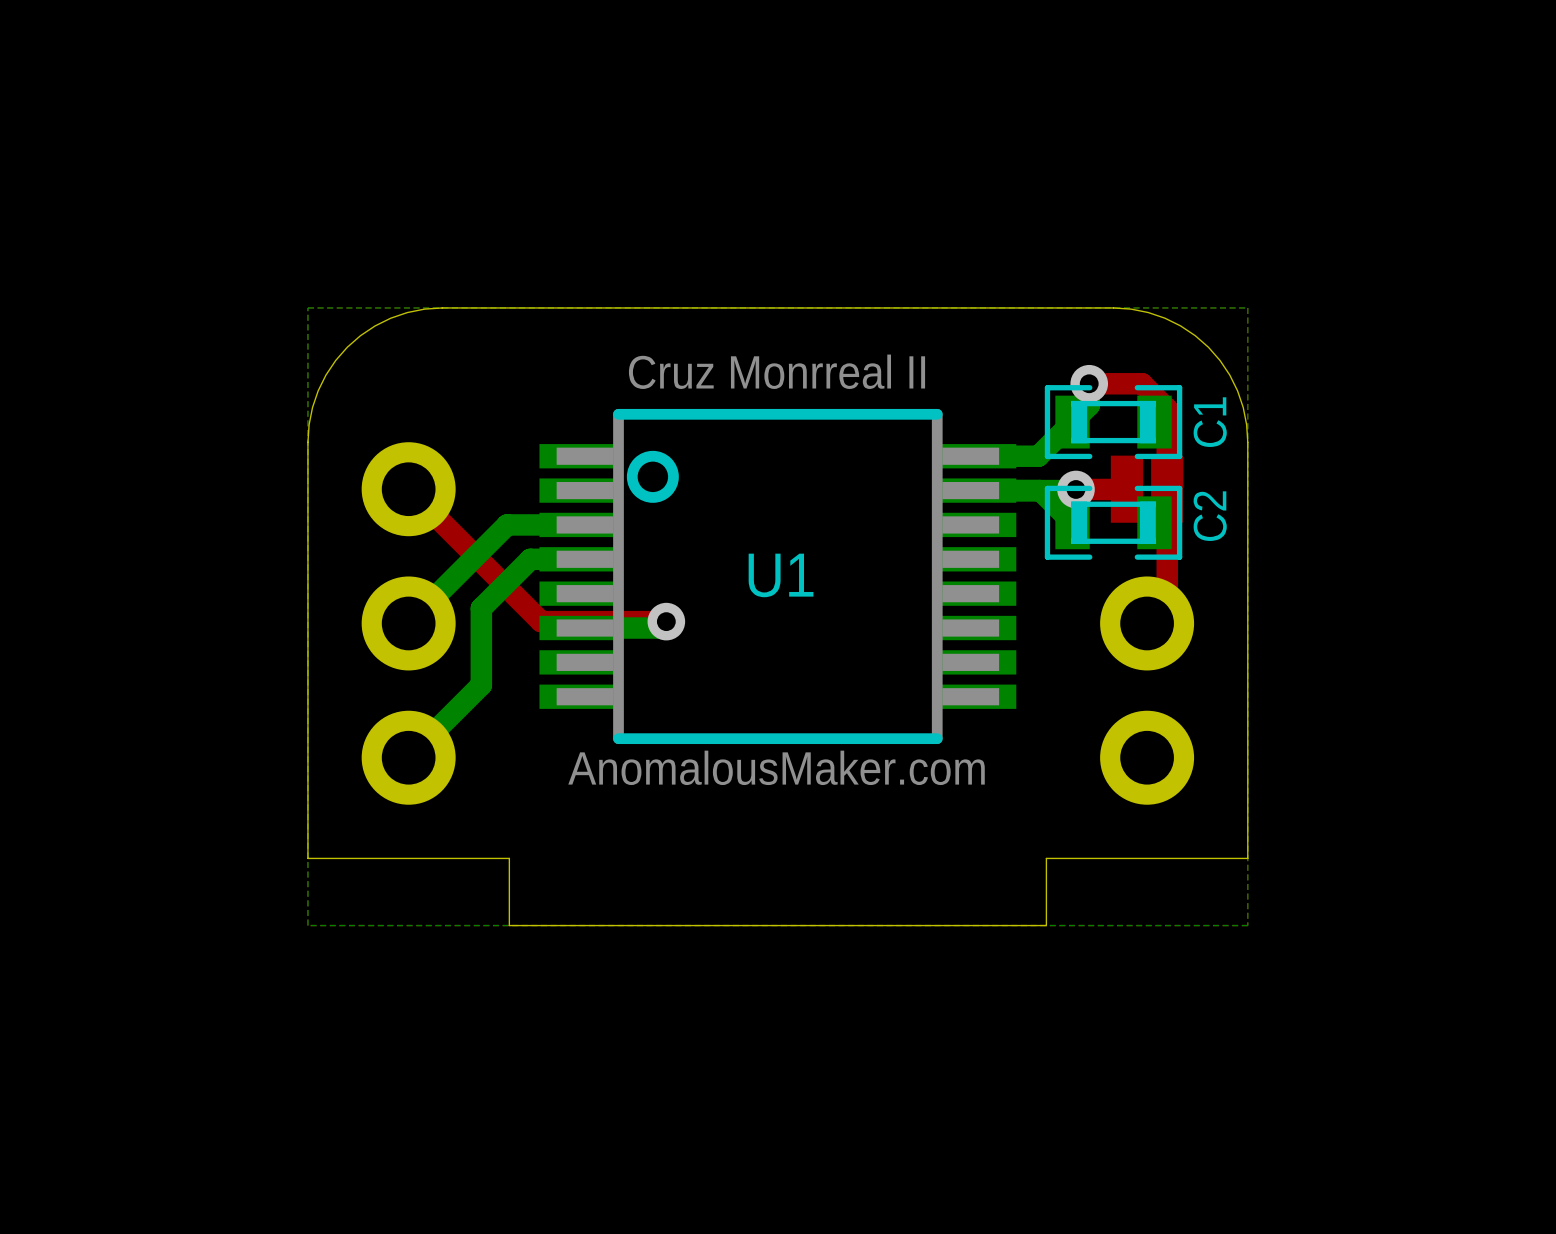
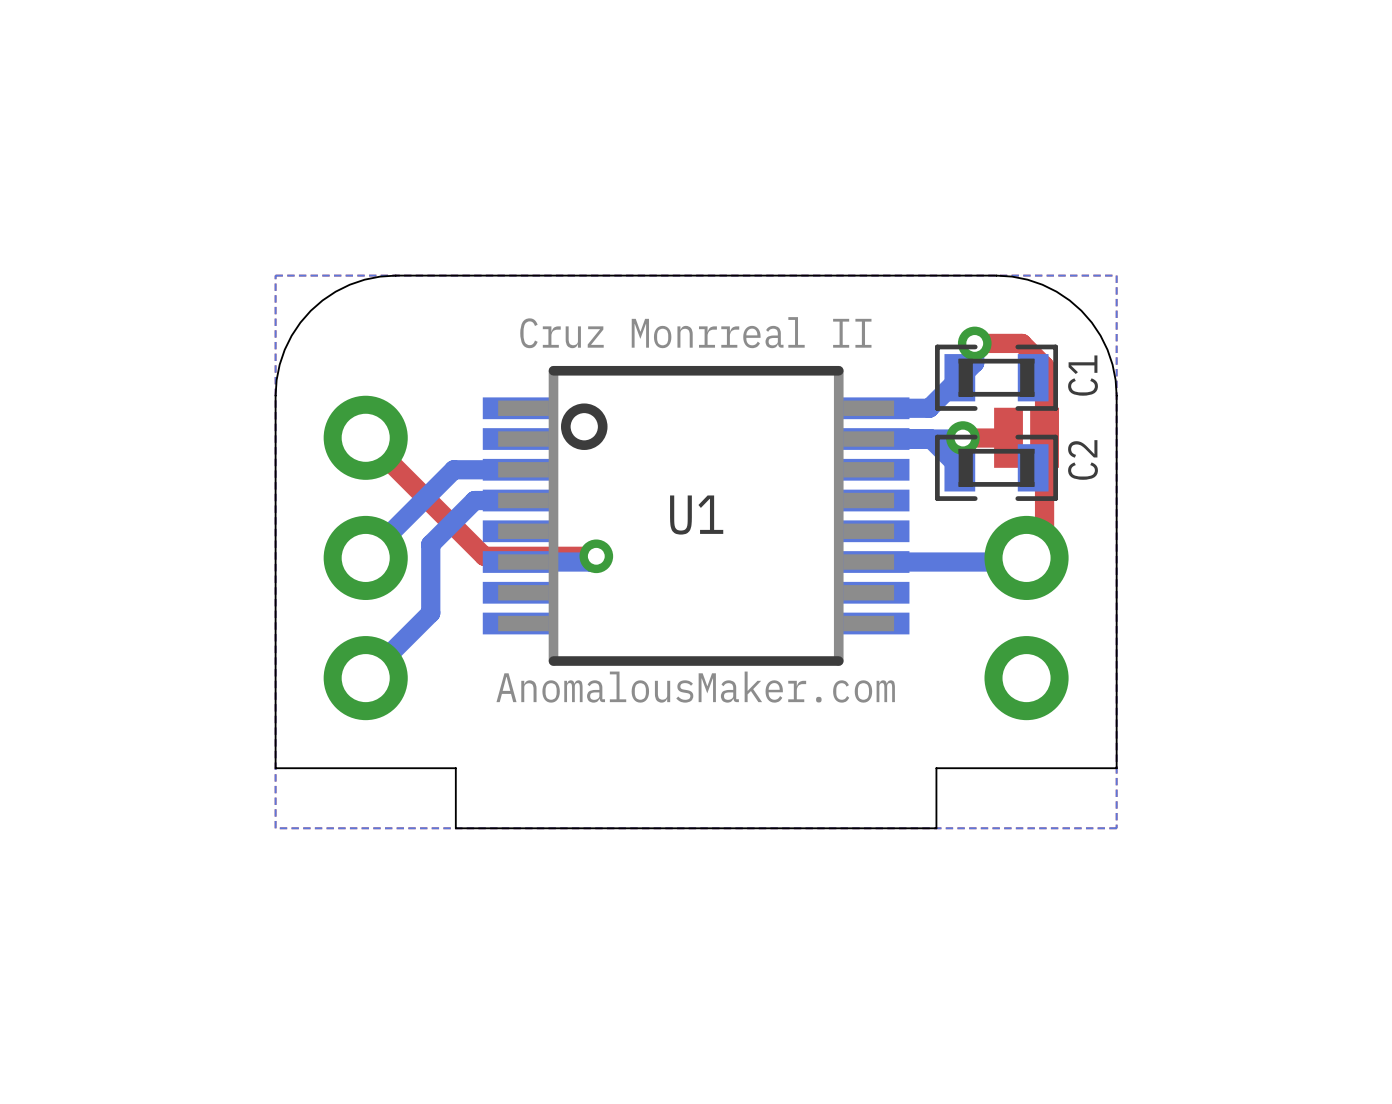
bottom track: none -> (1022, 562) (875, 562)

